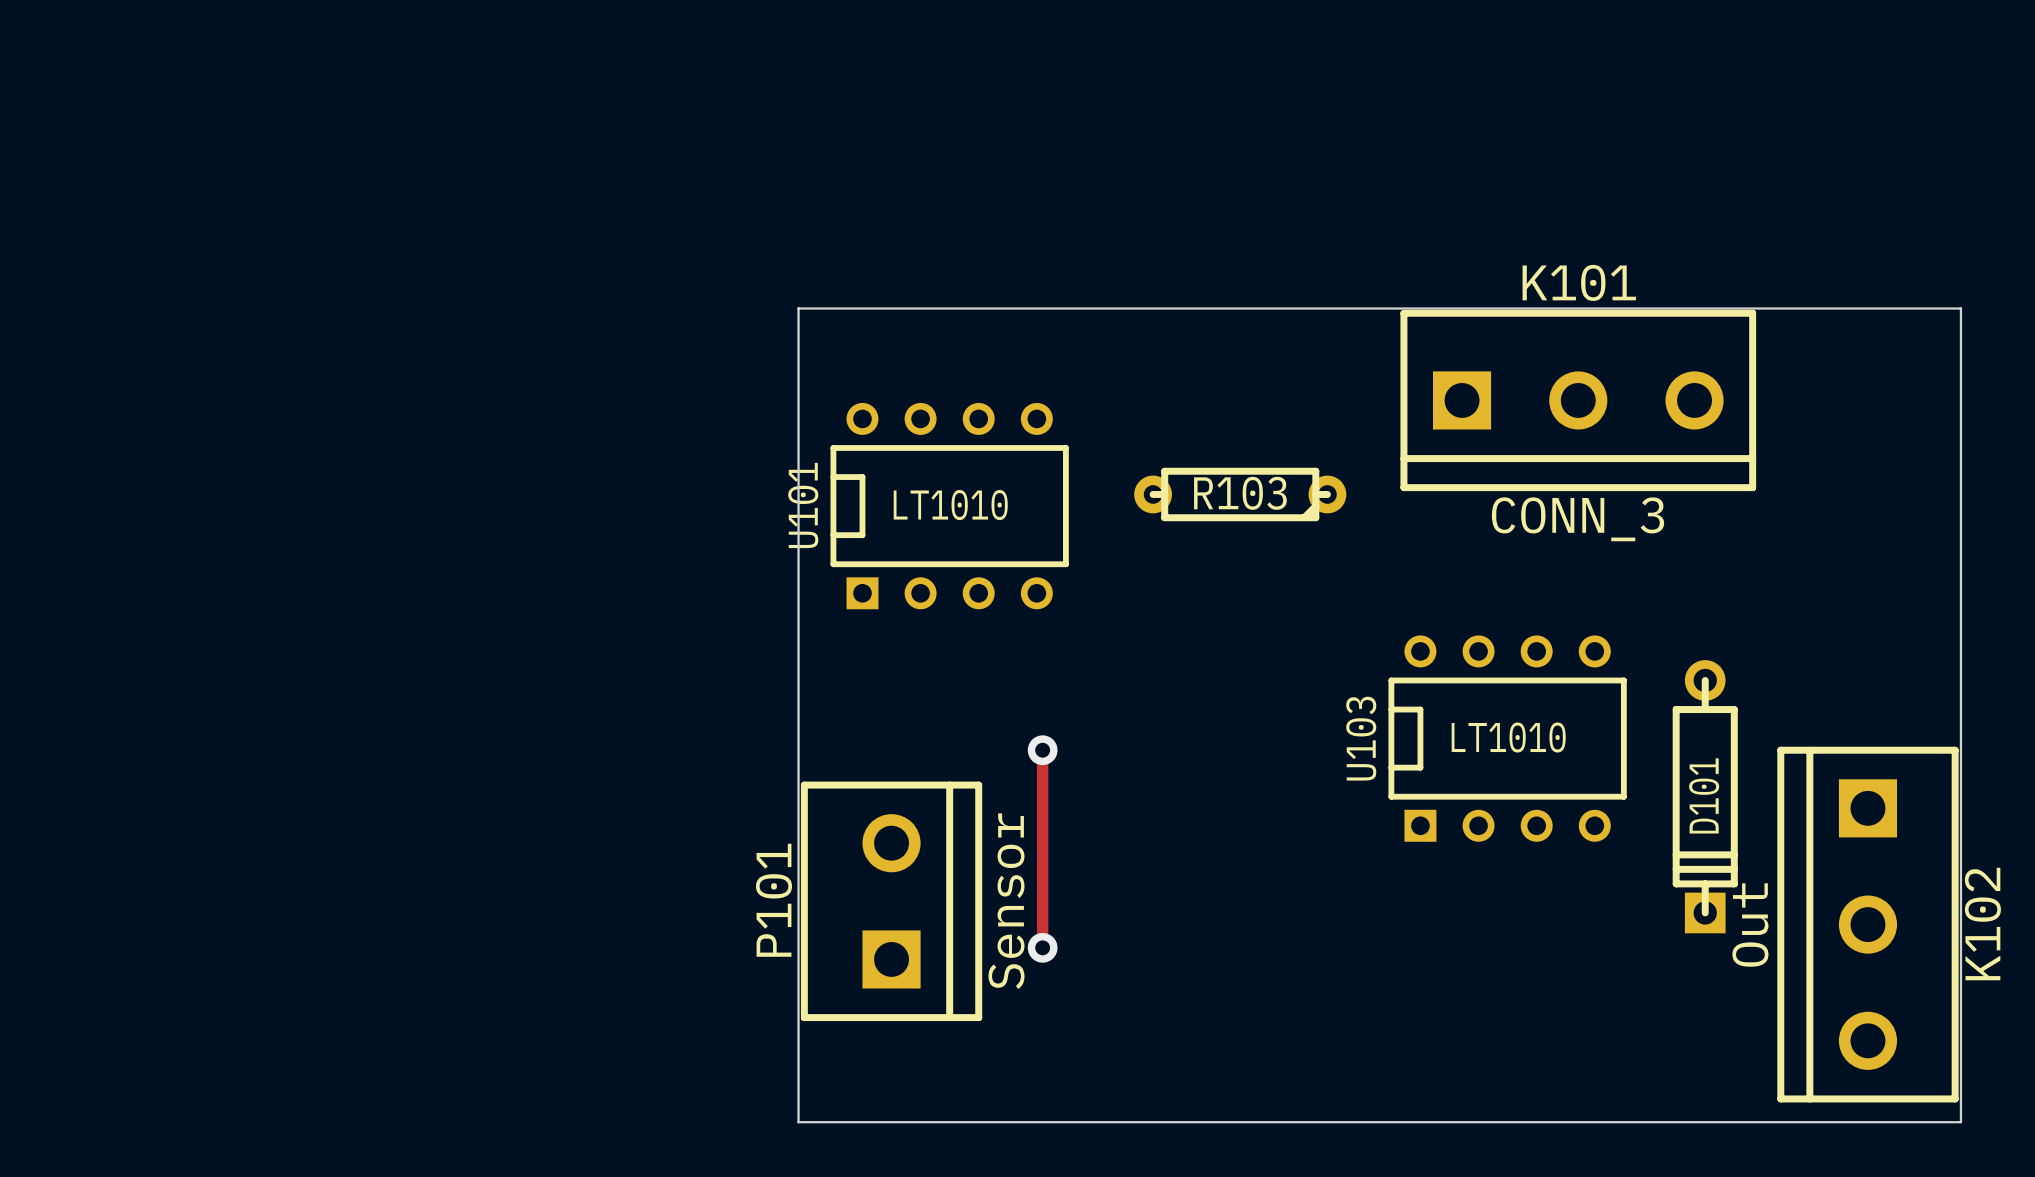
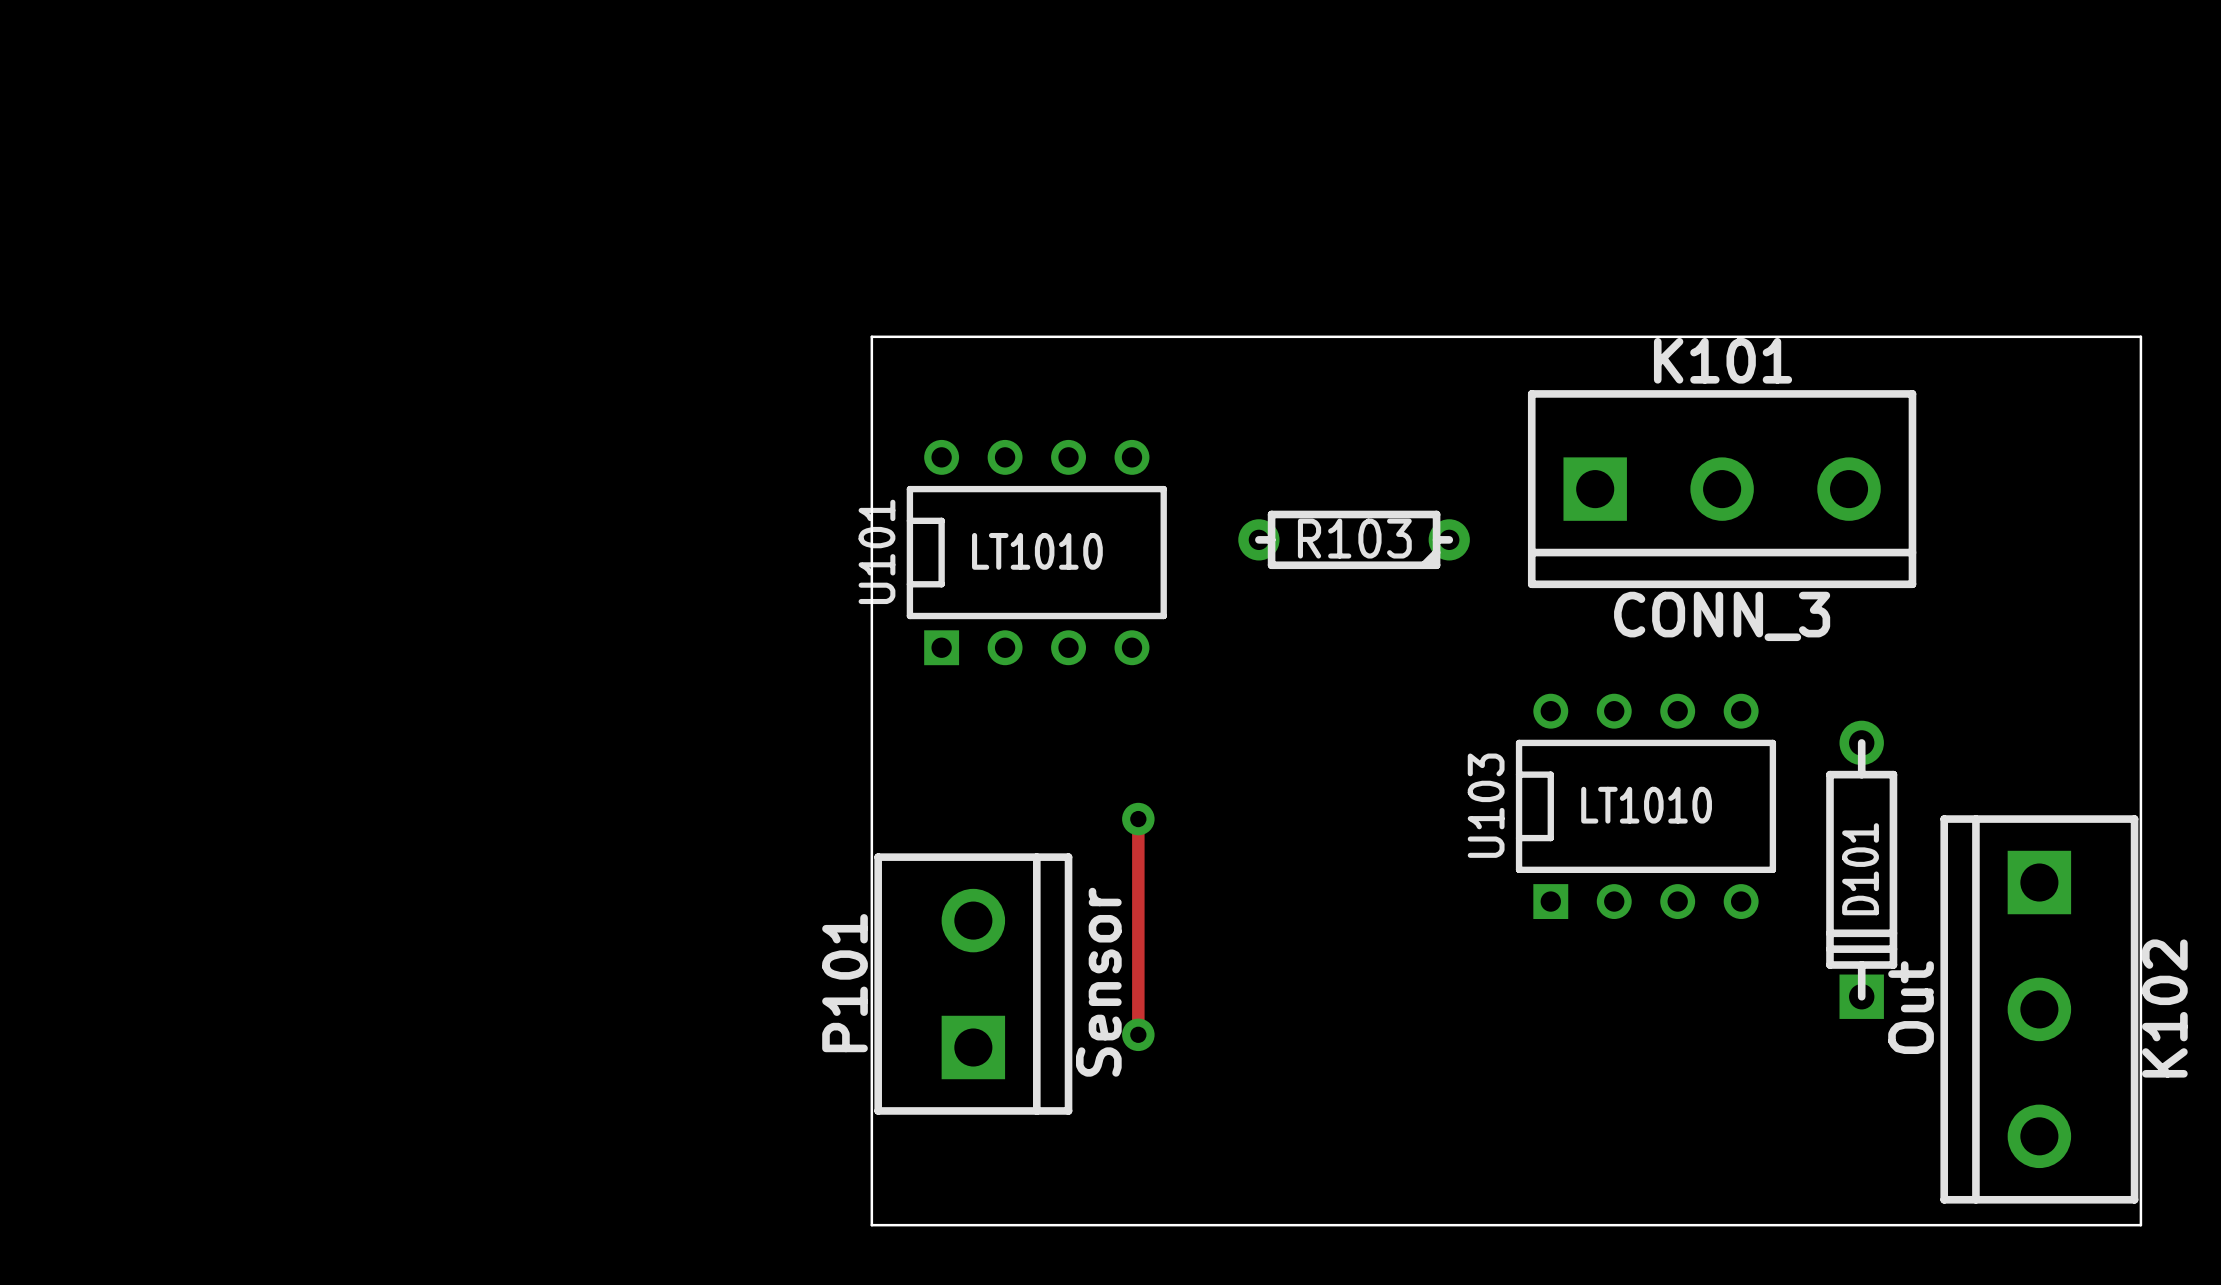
K101 position: (1578, 400) -> (1722, 489)

